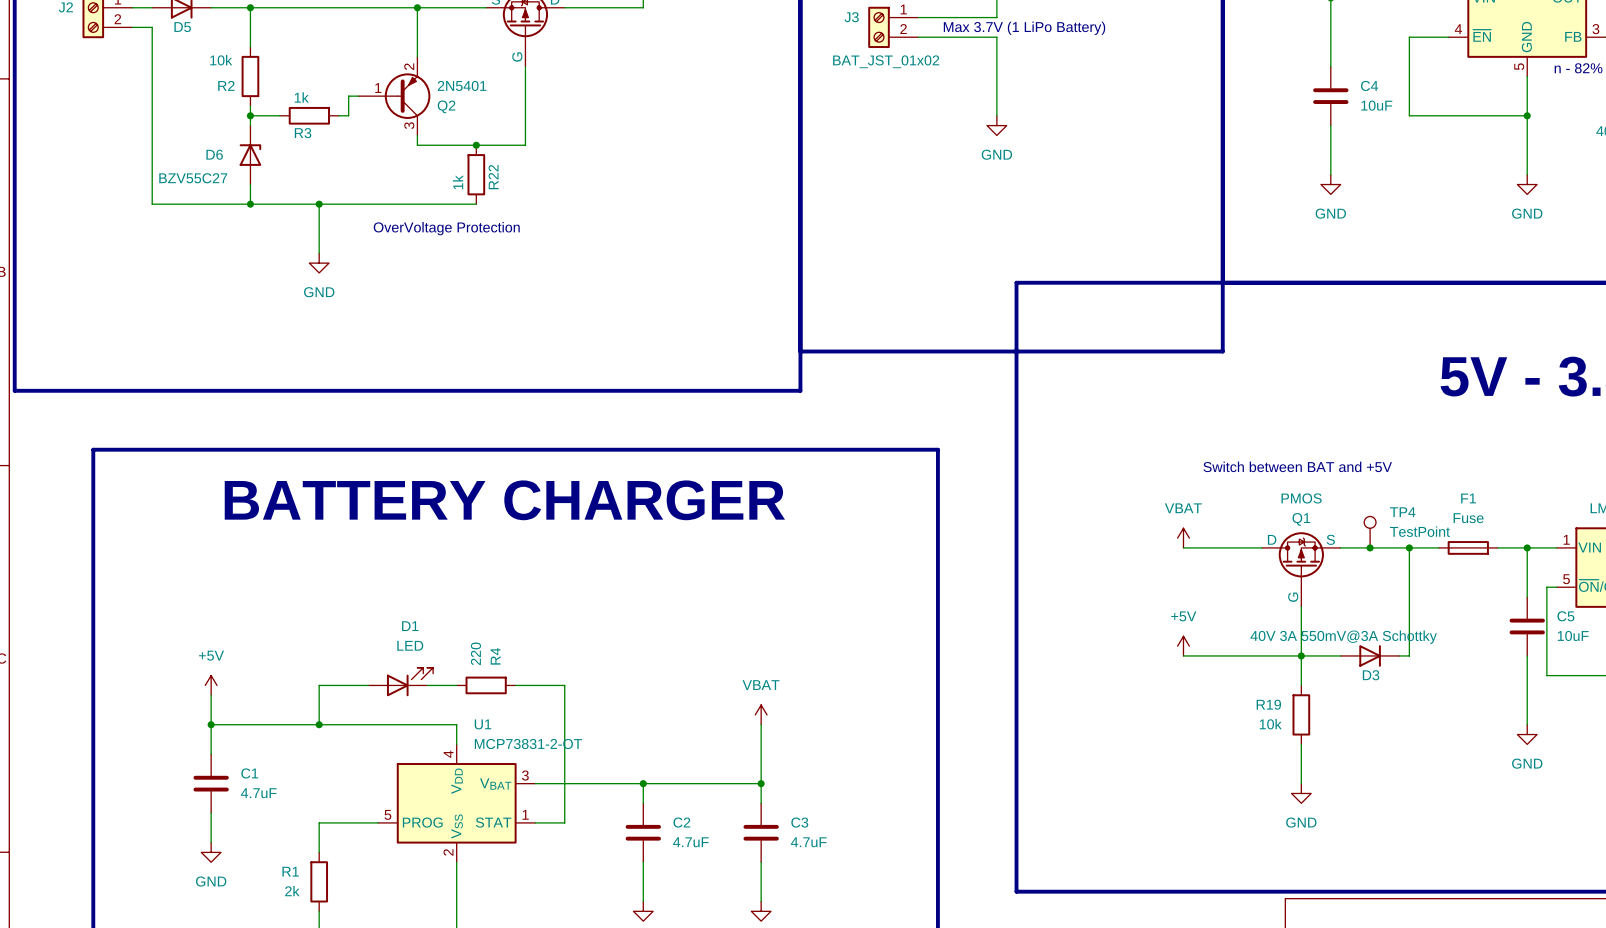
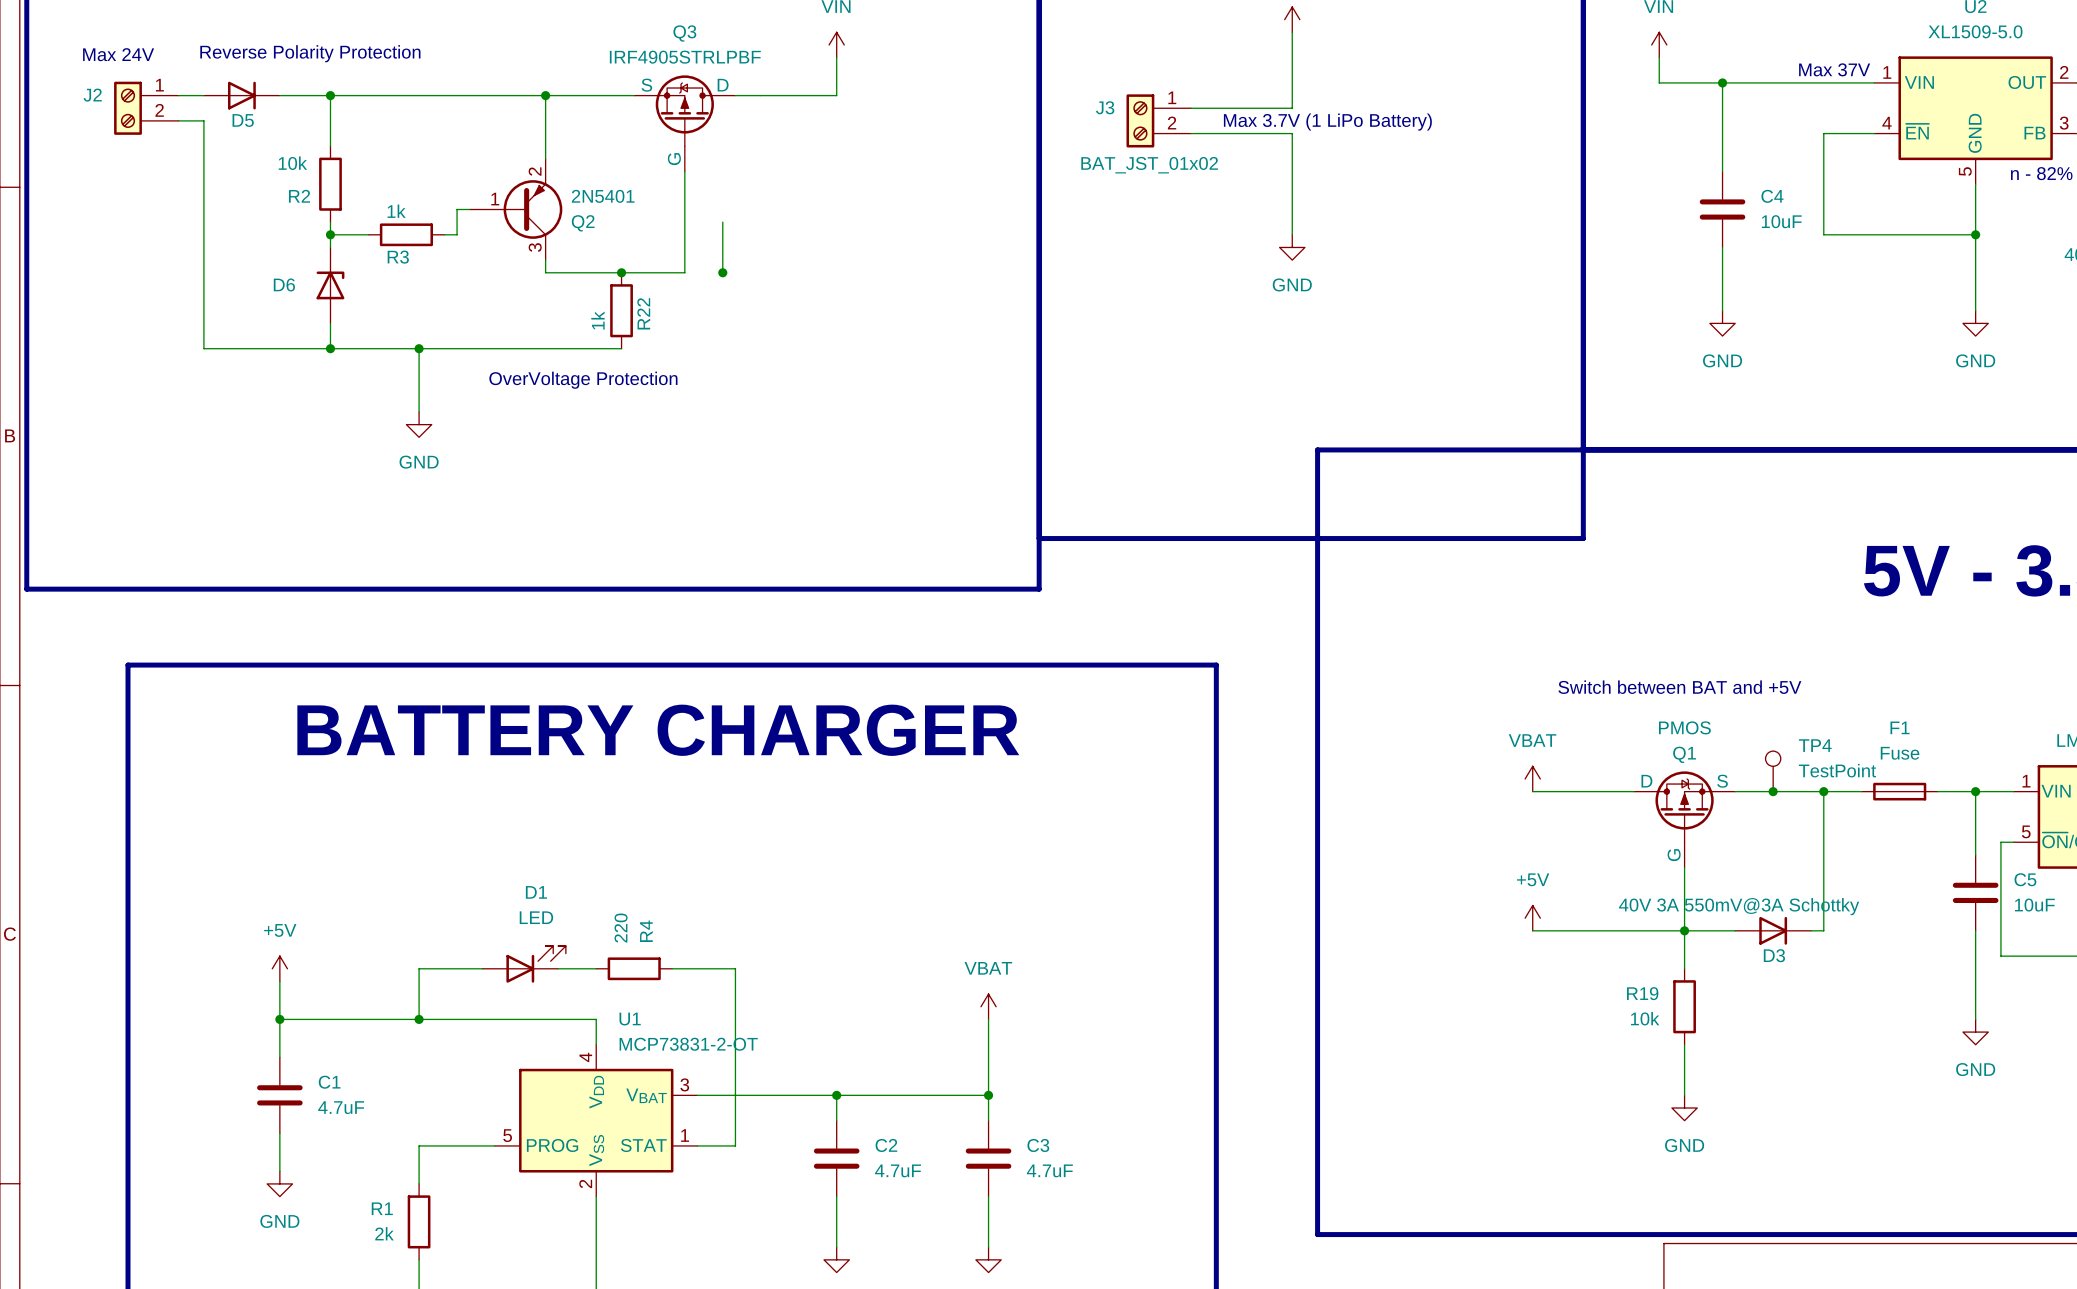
wire: none -> (722, 222) (722, 272)
junction: none -> (722, 272)
D6 value: BZV55C27 (193, 178) -> none

